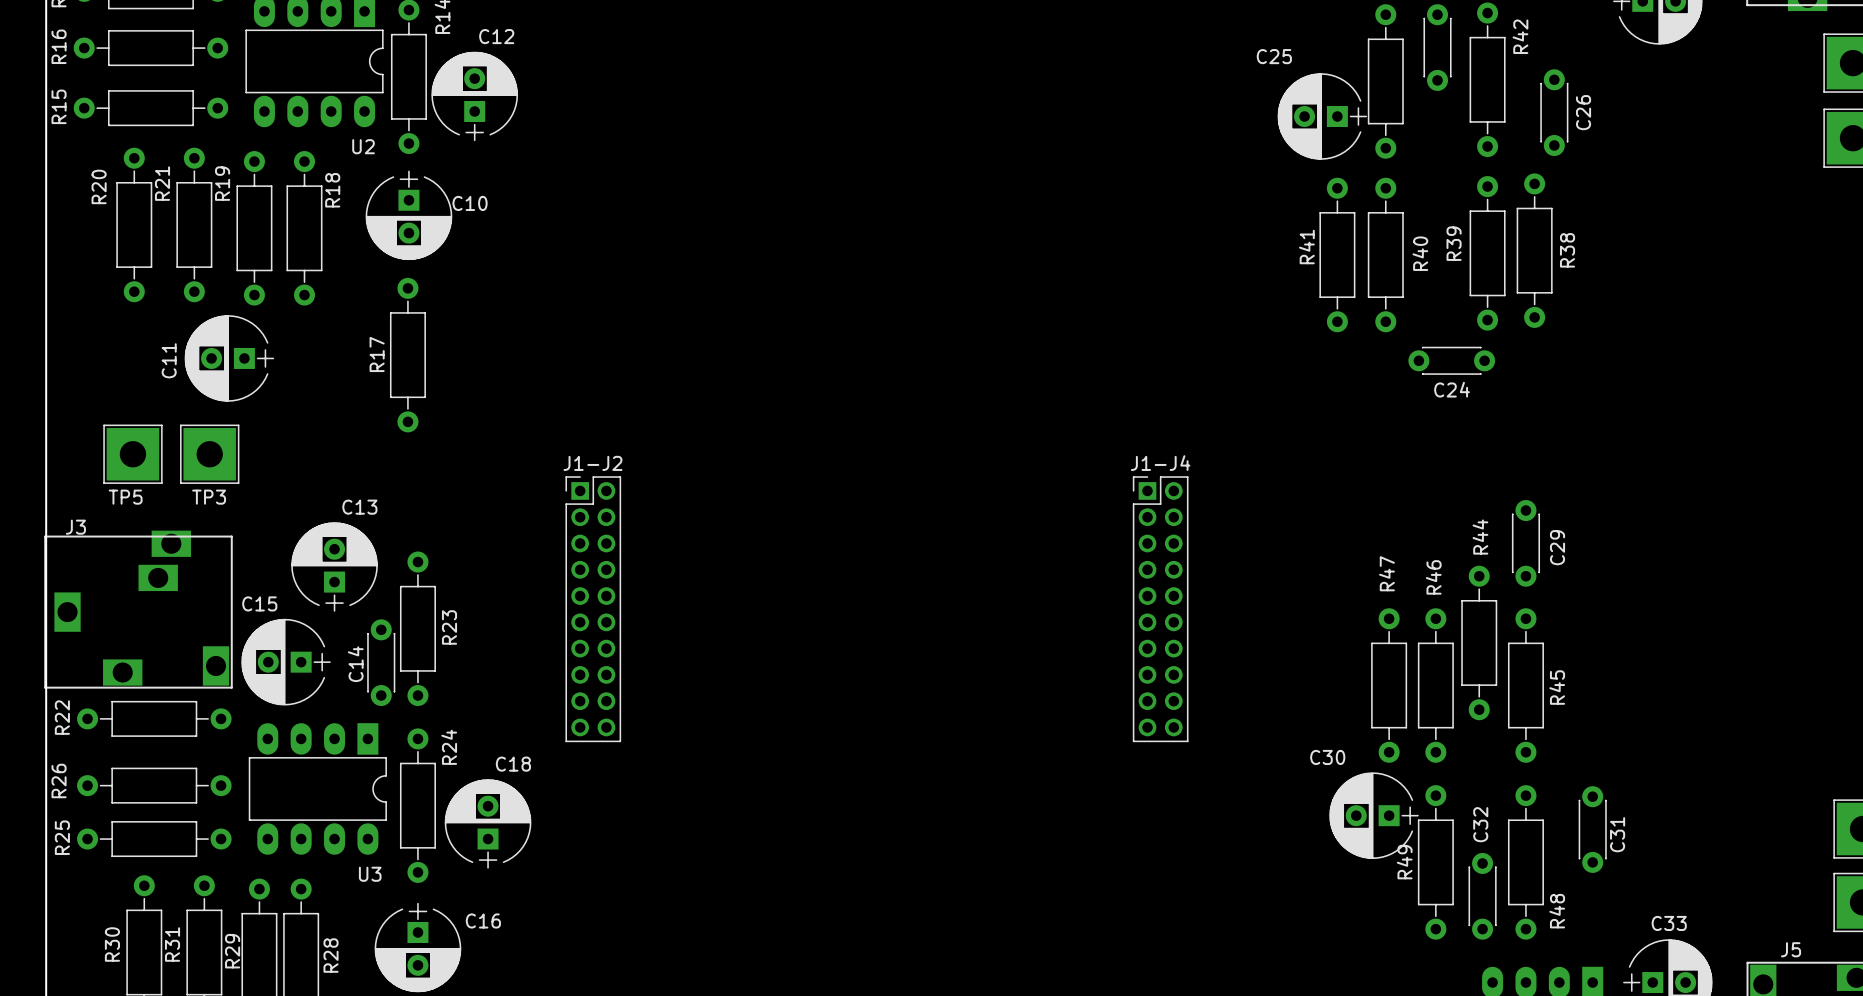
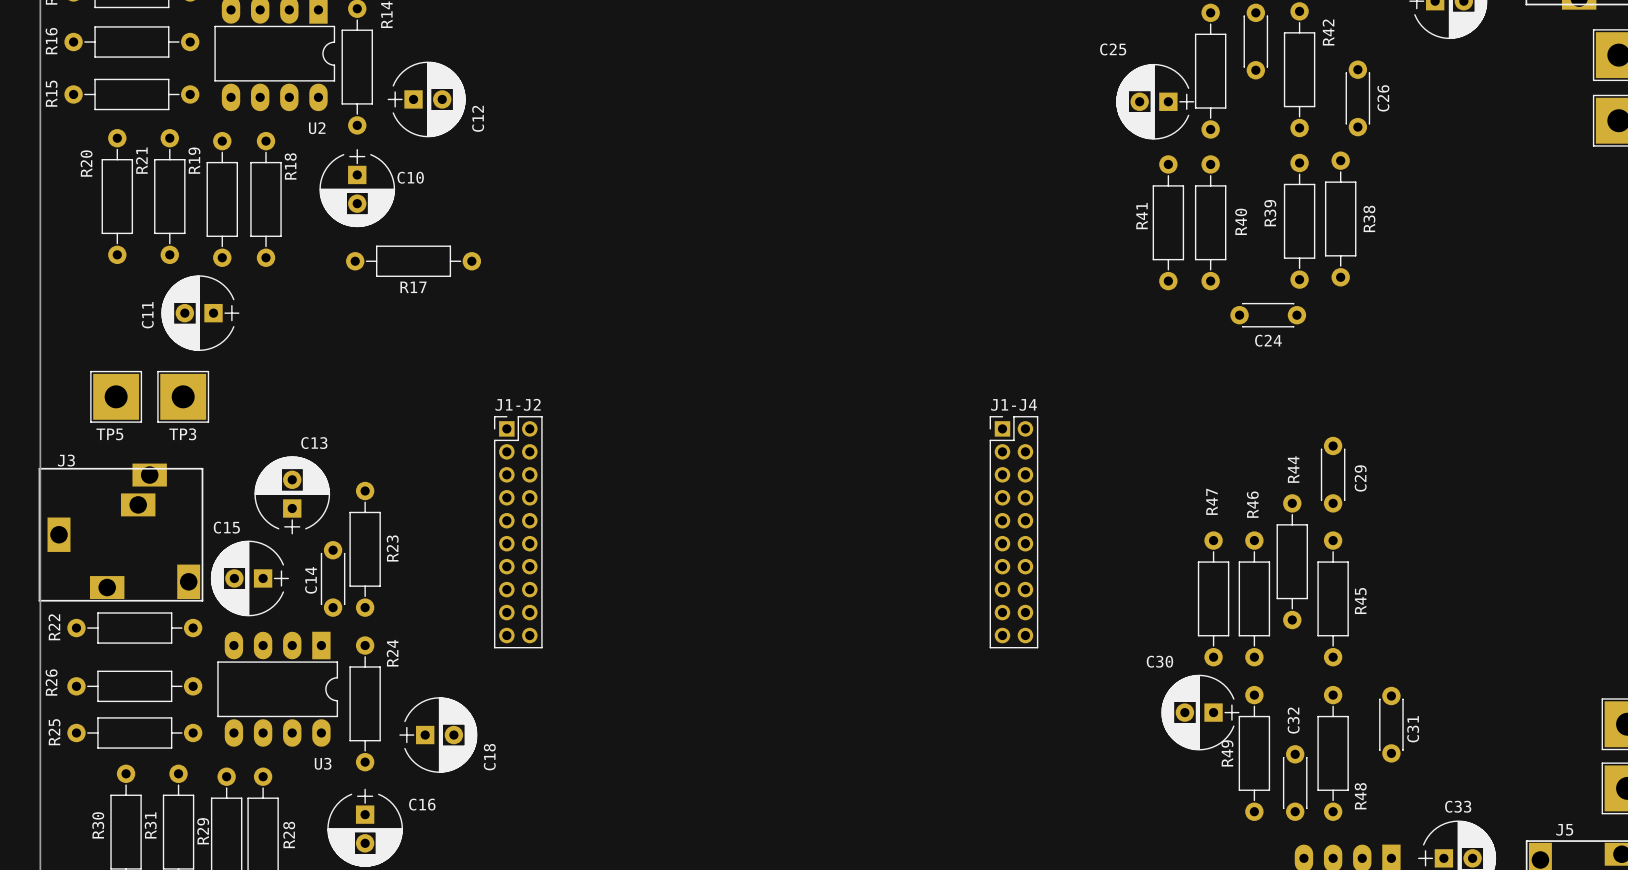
C12 rotation: 0° (474, 96) -> 90° clockwise (426, 99)
R17 name position: R17 (377, 354) -> R17 (413, 287)
R17 rotation: 0° (407, 355) -> 90° clockwise (413, 261)
C18 rotation: 0° (488, 823) -> 90° clockwise (438, 735)

